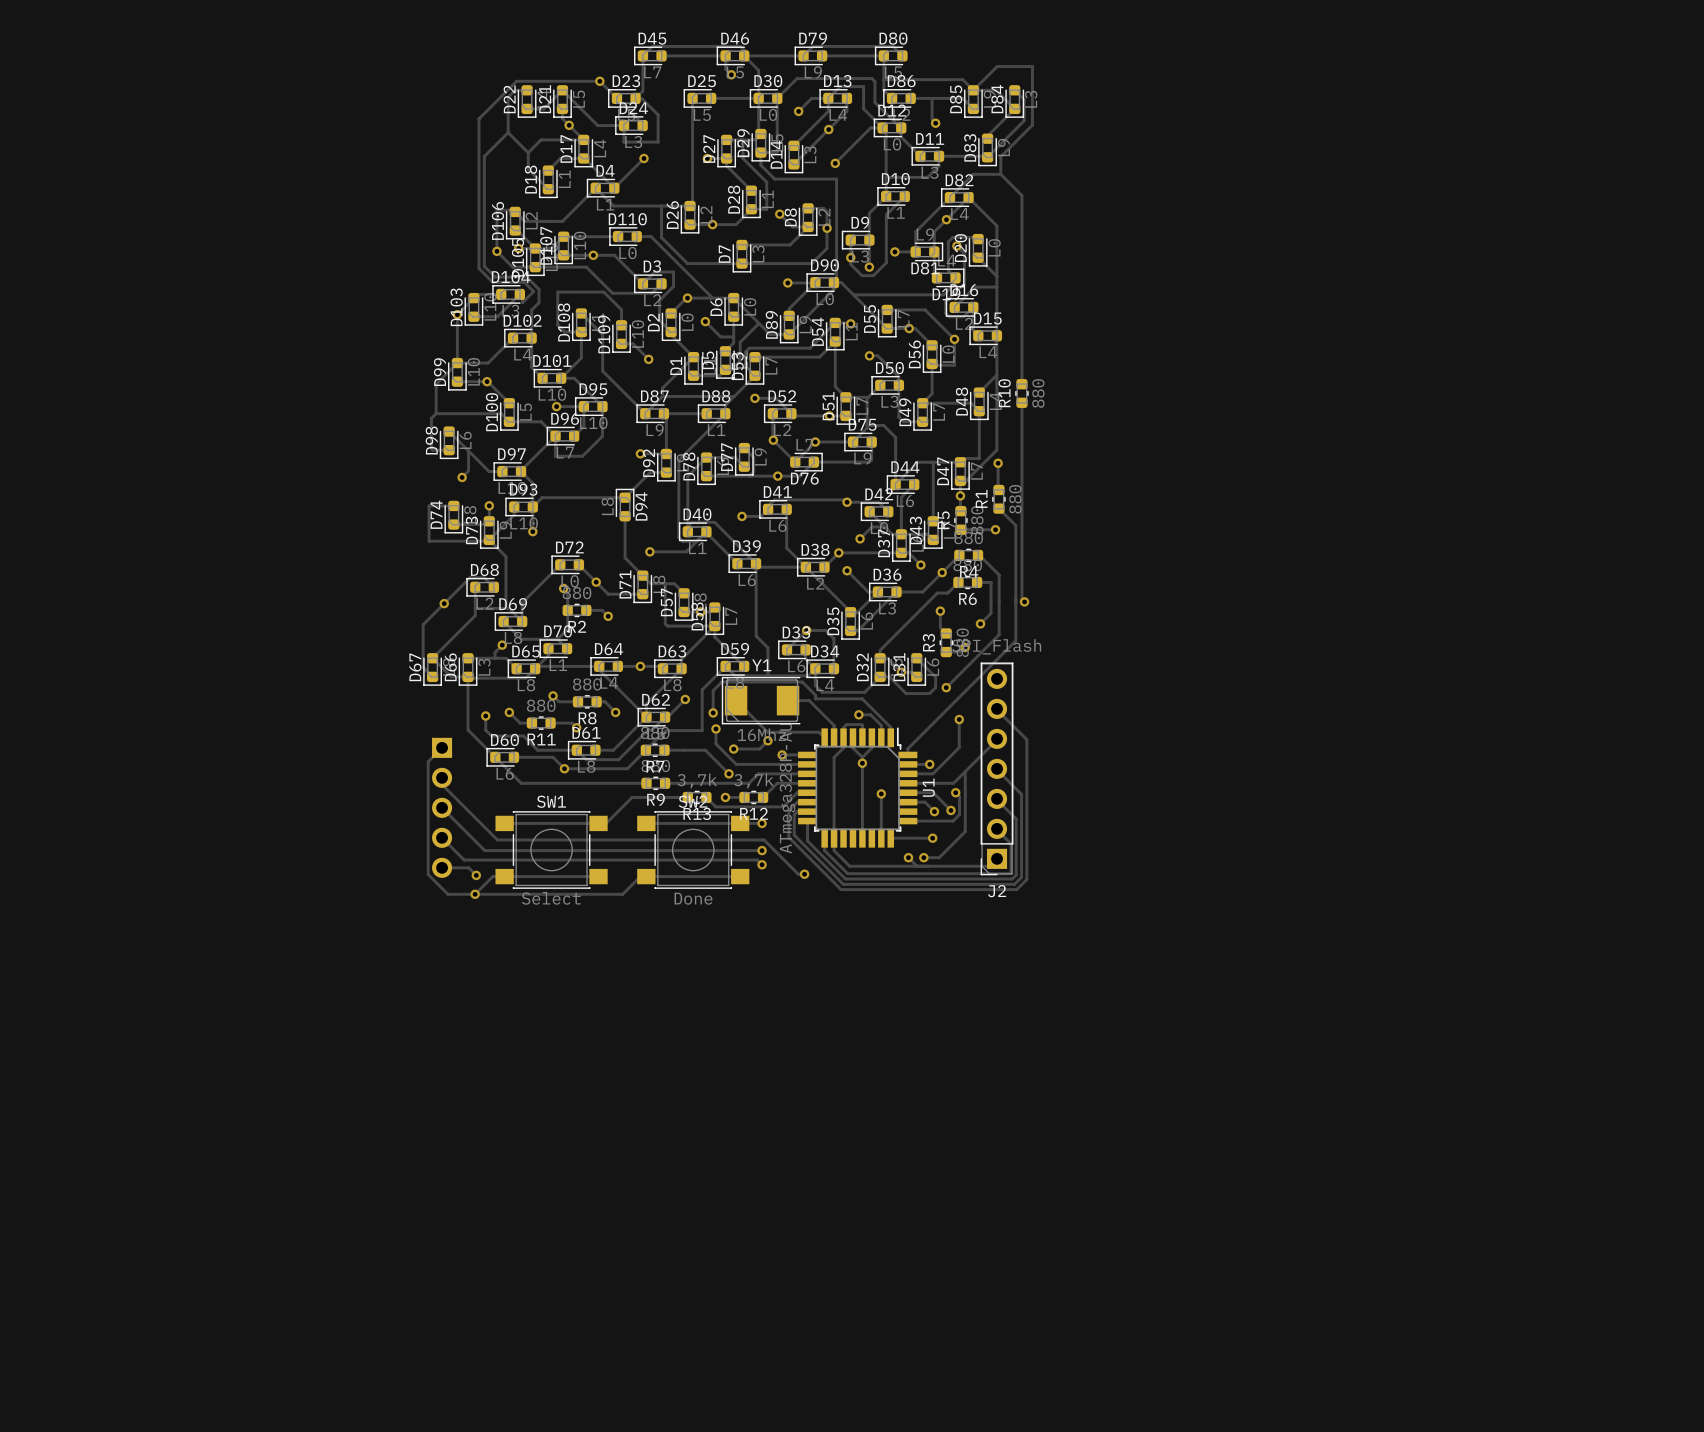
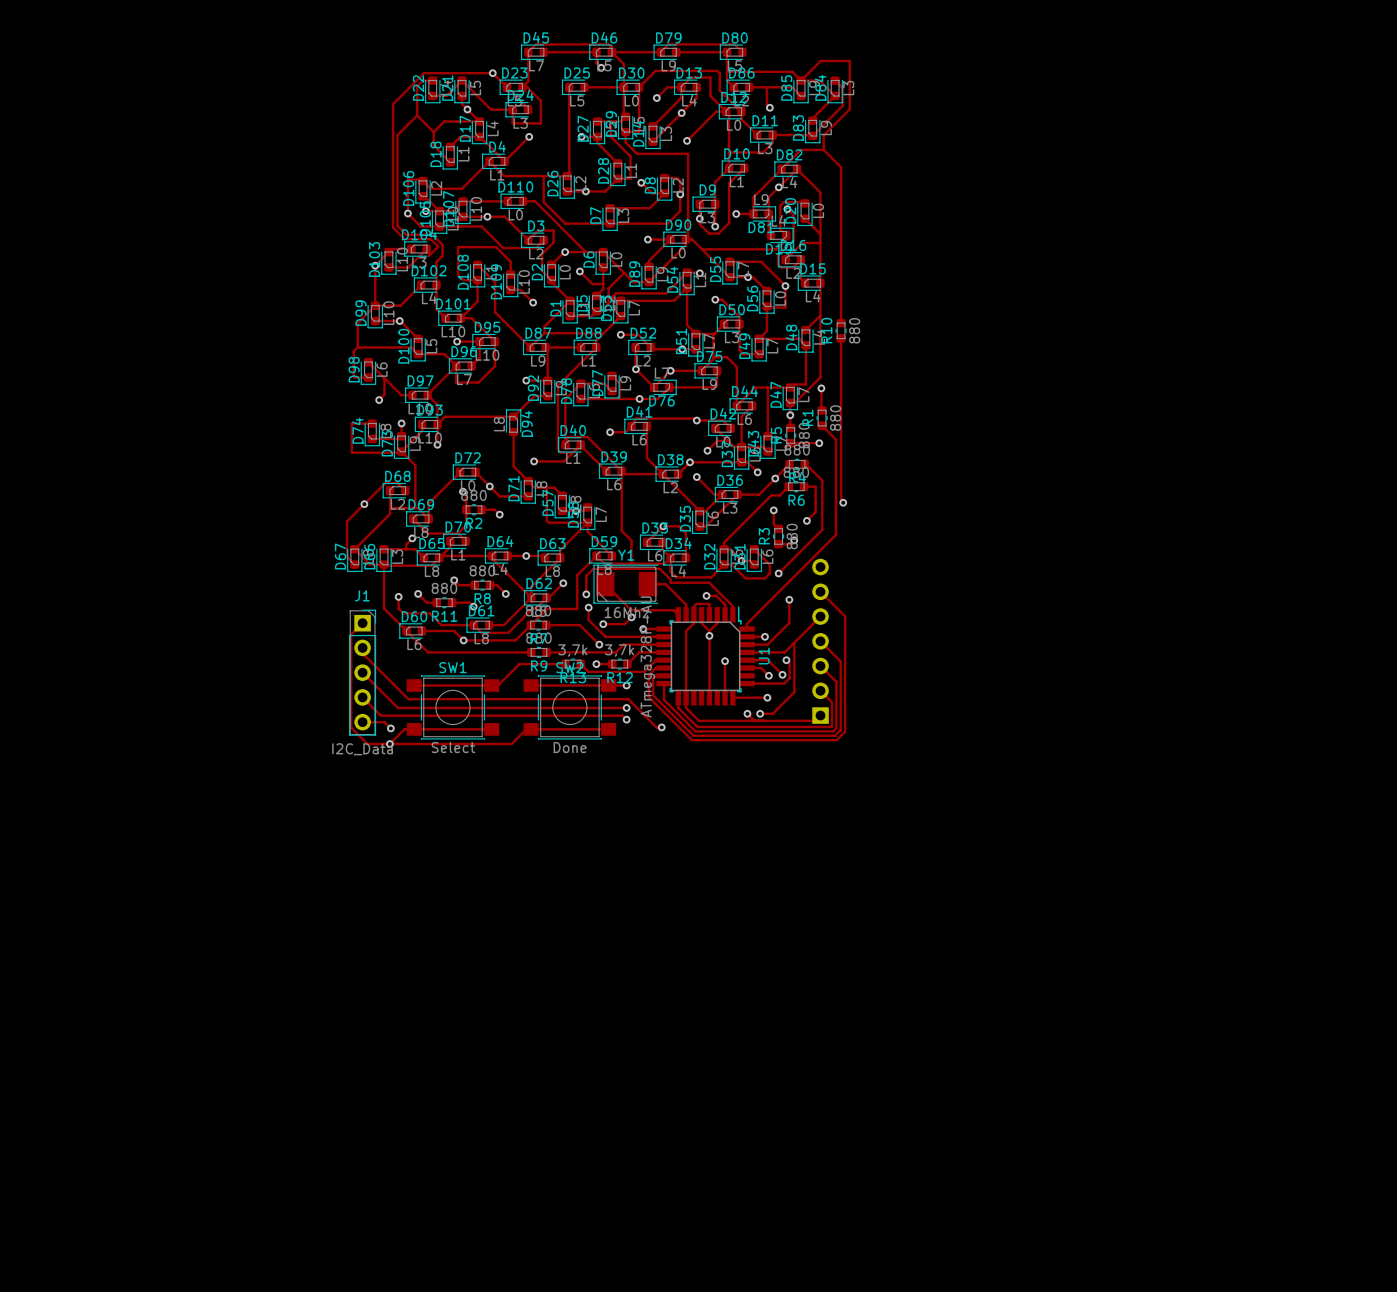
J2 side: top (997, 768) -> bottom (820, 641)
J1 side: bottom (442, 807) -> top (362, 672)

